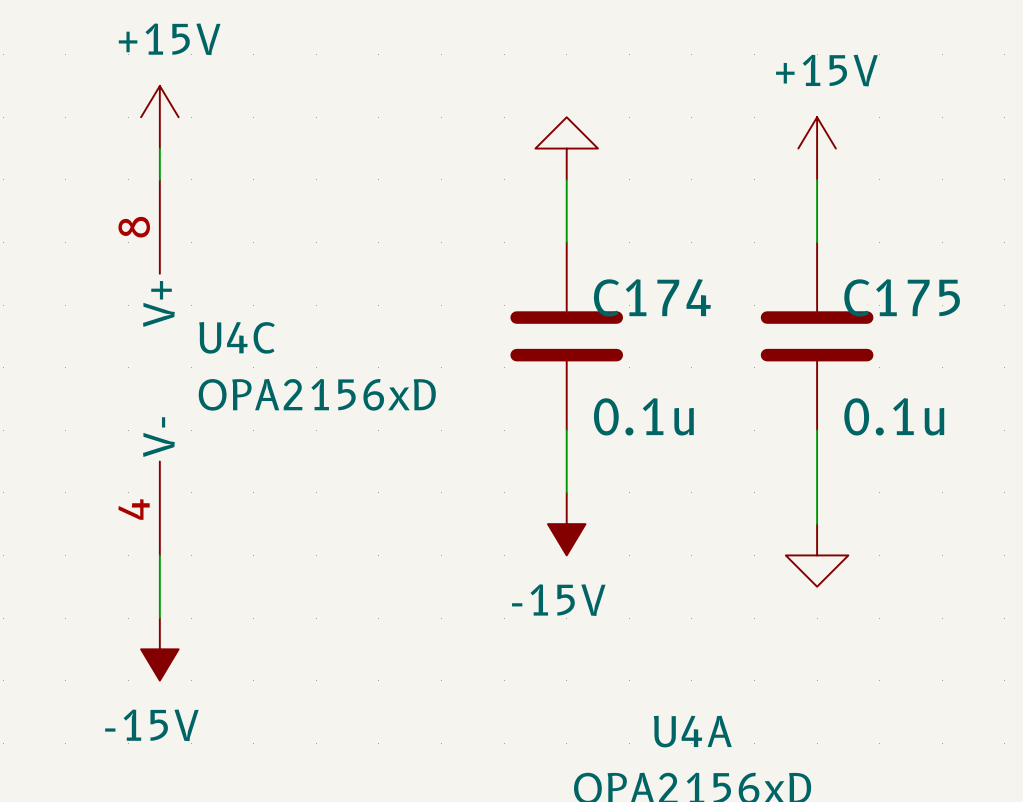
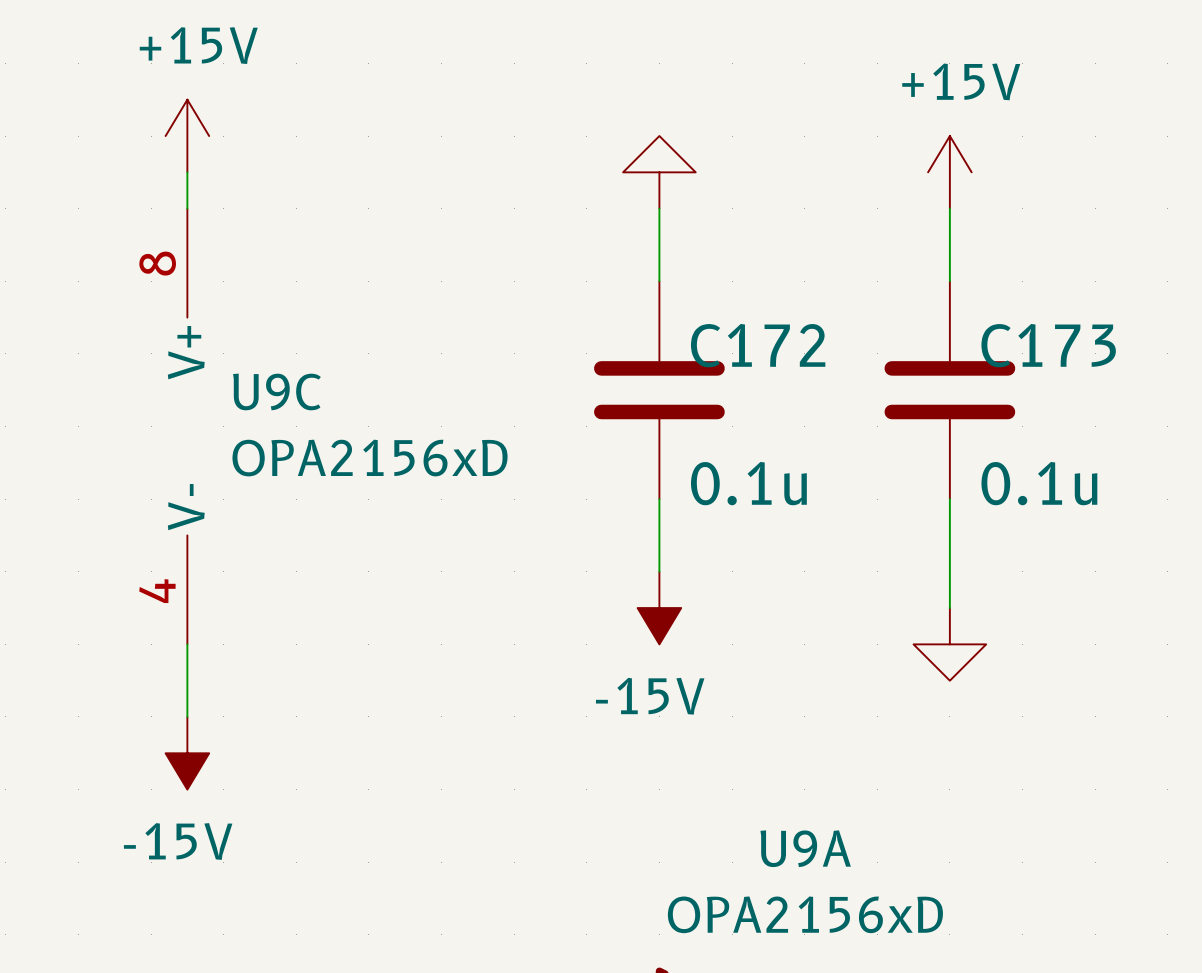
C174 name: C174 (652, 297) -> C172 (758, 345)
C175 name: C175 (902, 297) -> C173 (1048, 345)
U4C name: U4C (237, 337) -> U9C (276, 391)
U4A name: U4A (692, 731) -> U9A (805, 848)

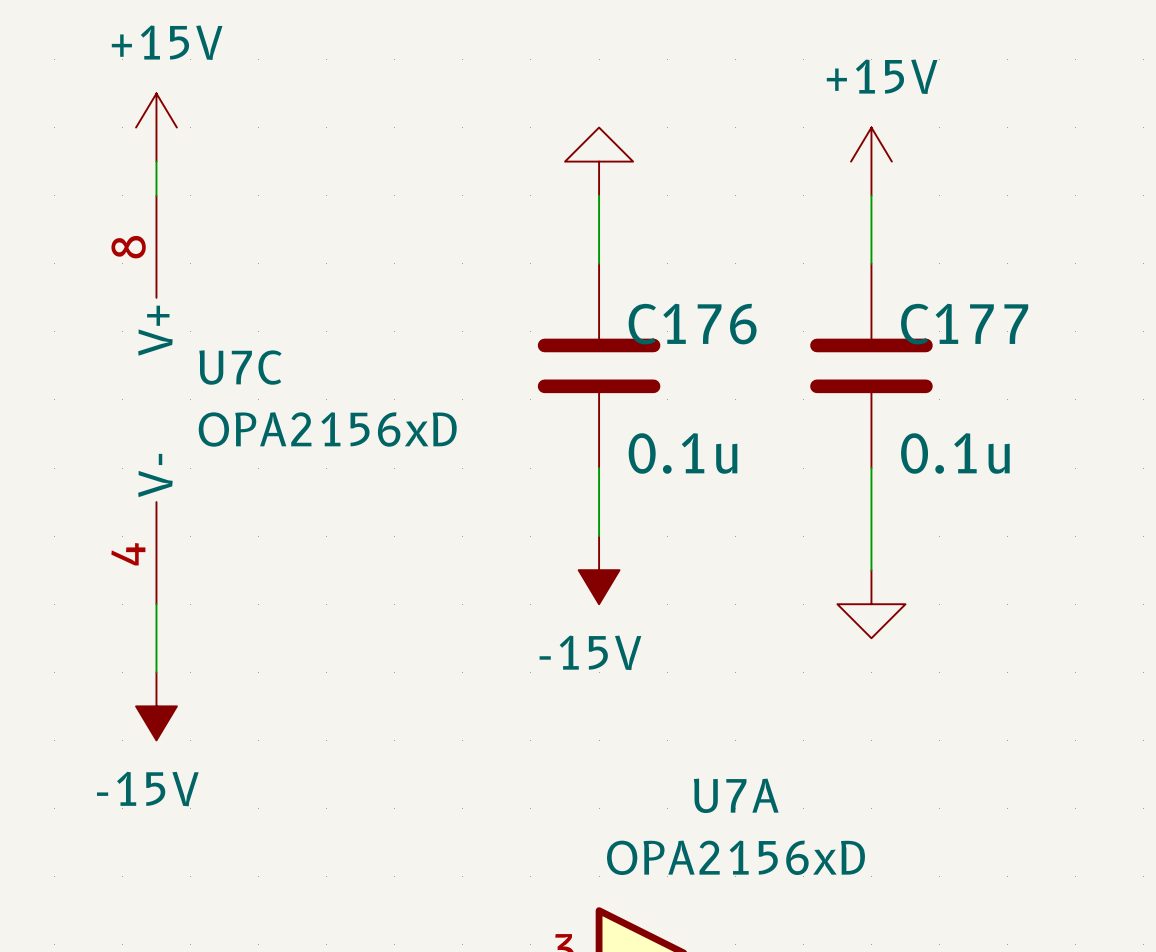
C172 name: C172 (758, 345) -> C176 (692, 324)
C173 name: C173 (1048, 345) -> C177 (964, 324)
U9C name: U9C (276, 391) -> U7C (240, 367)
U9A name: U9A (805, 848) -> U7A (736, 795)

